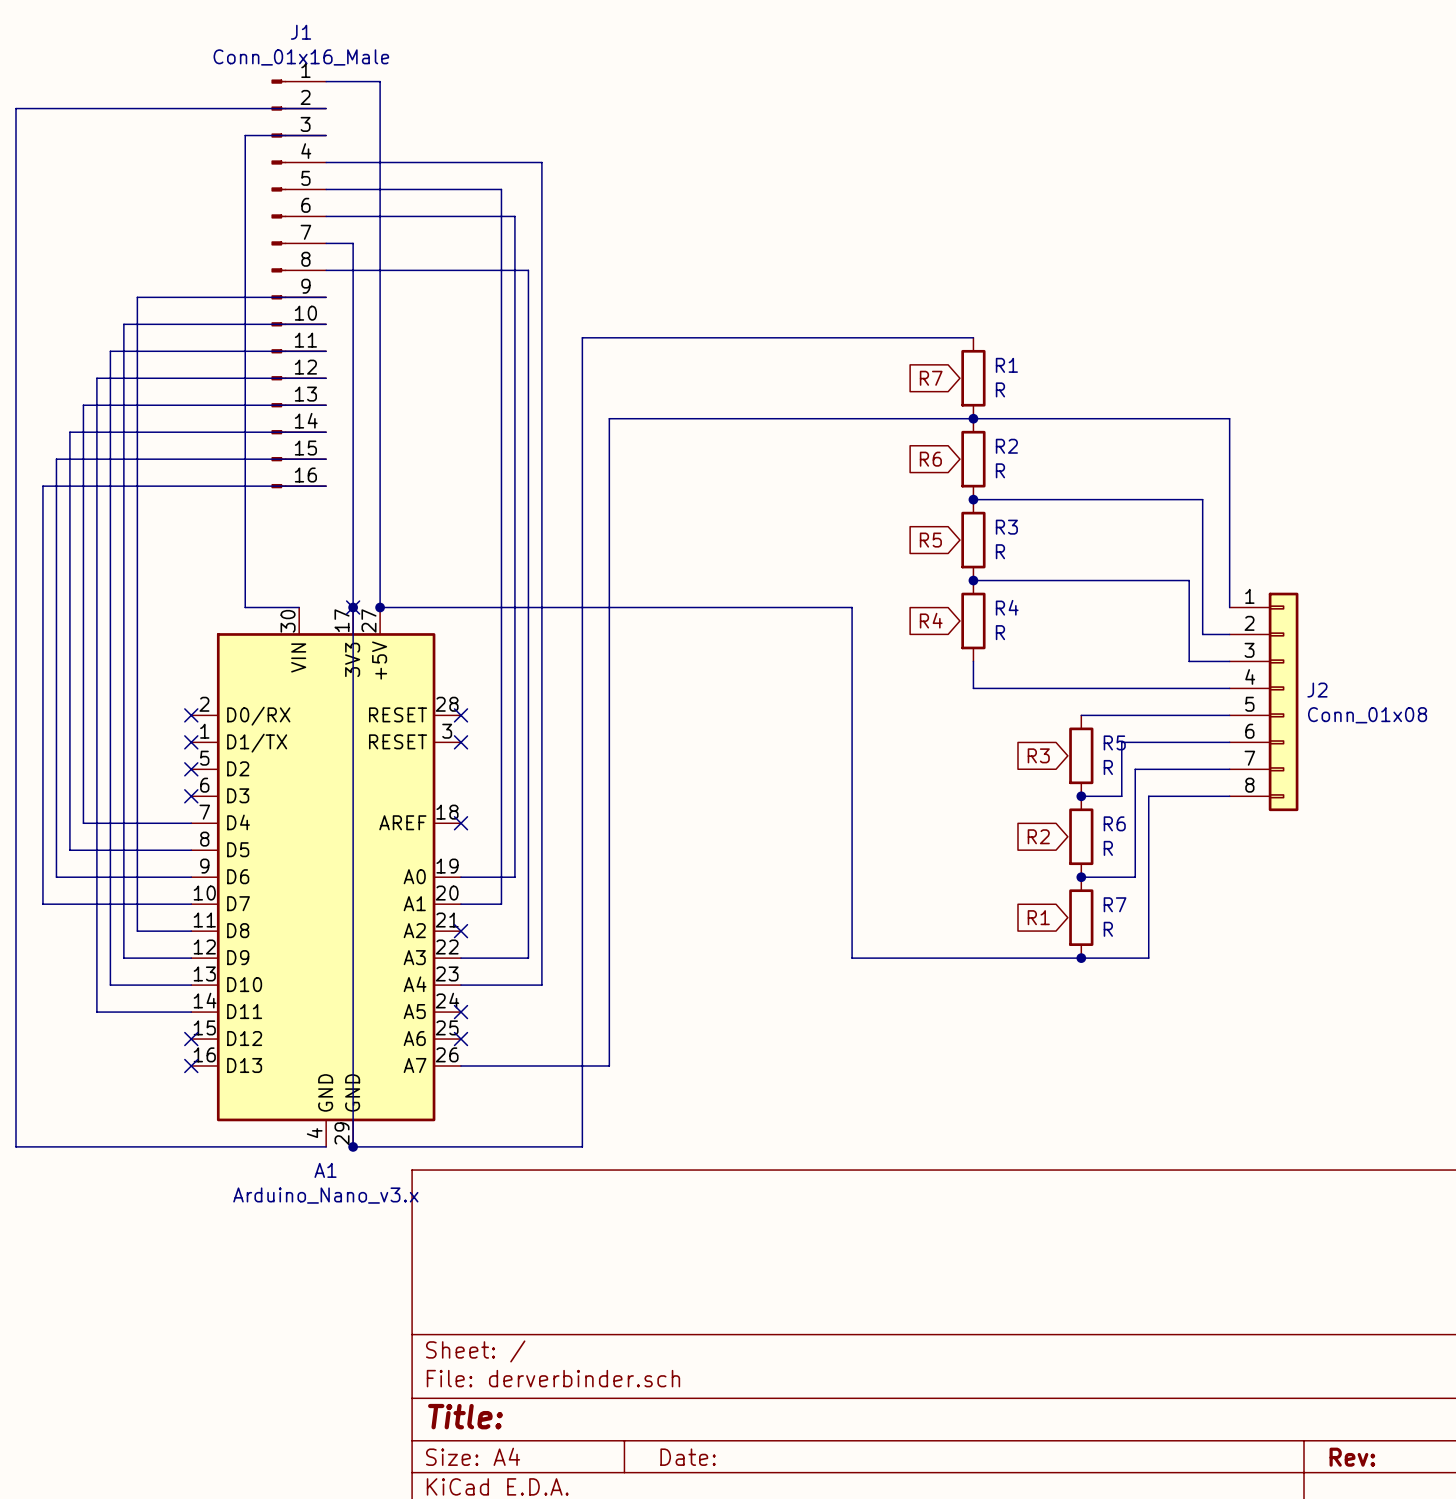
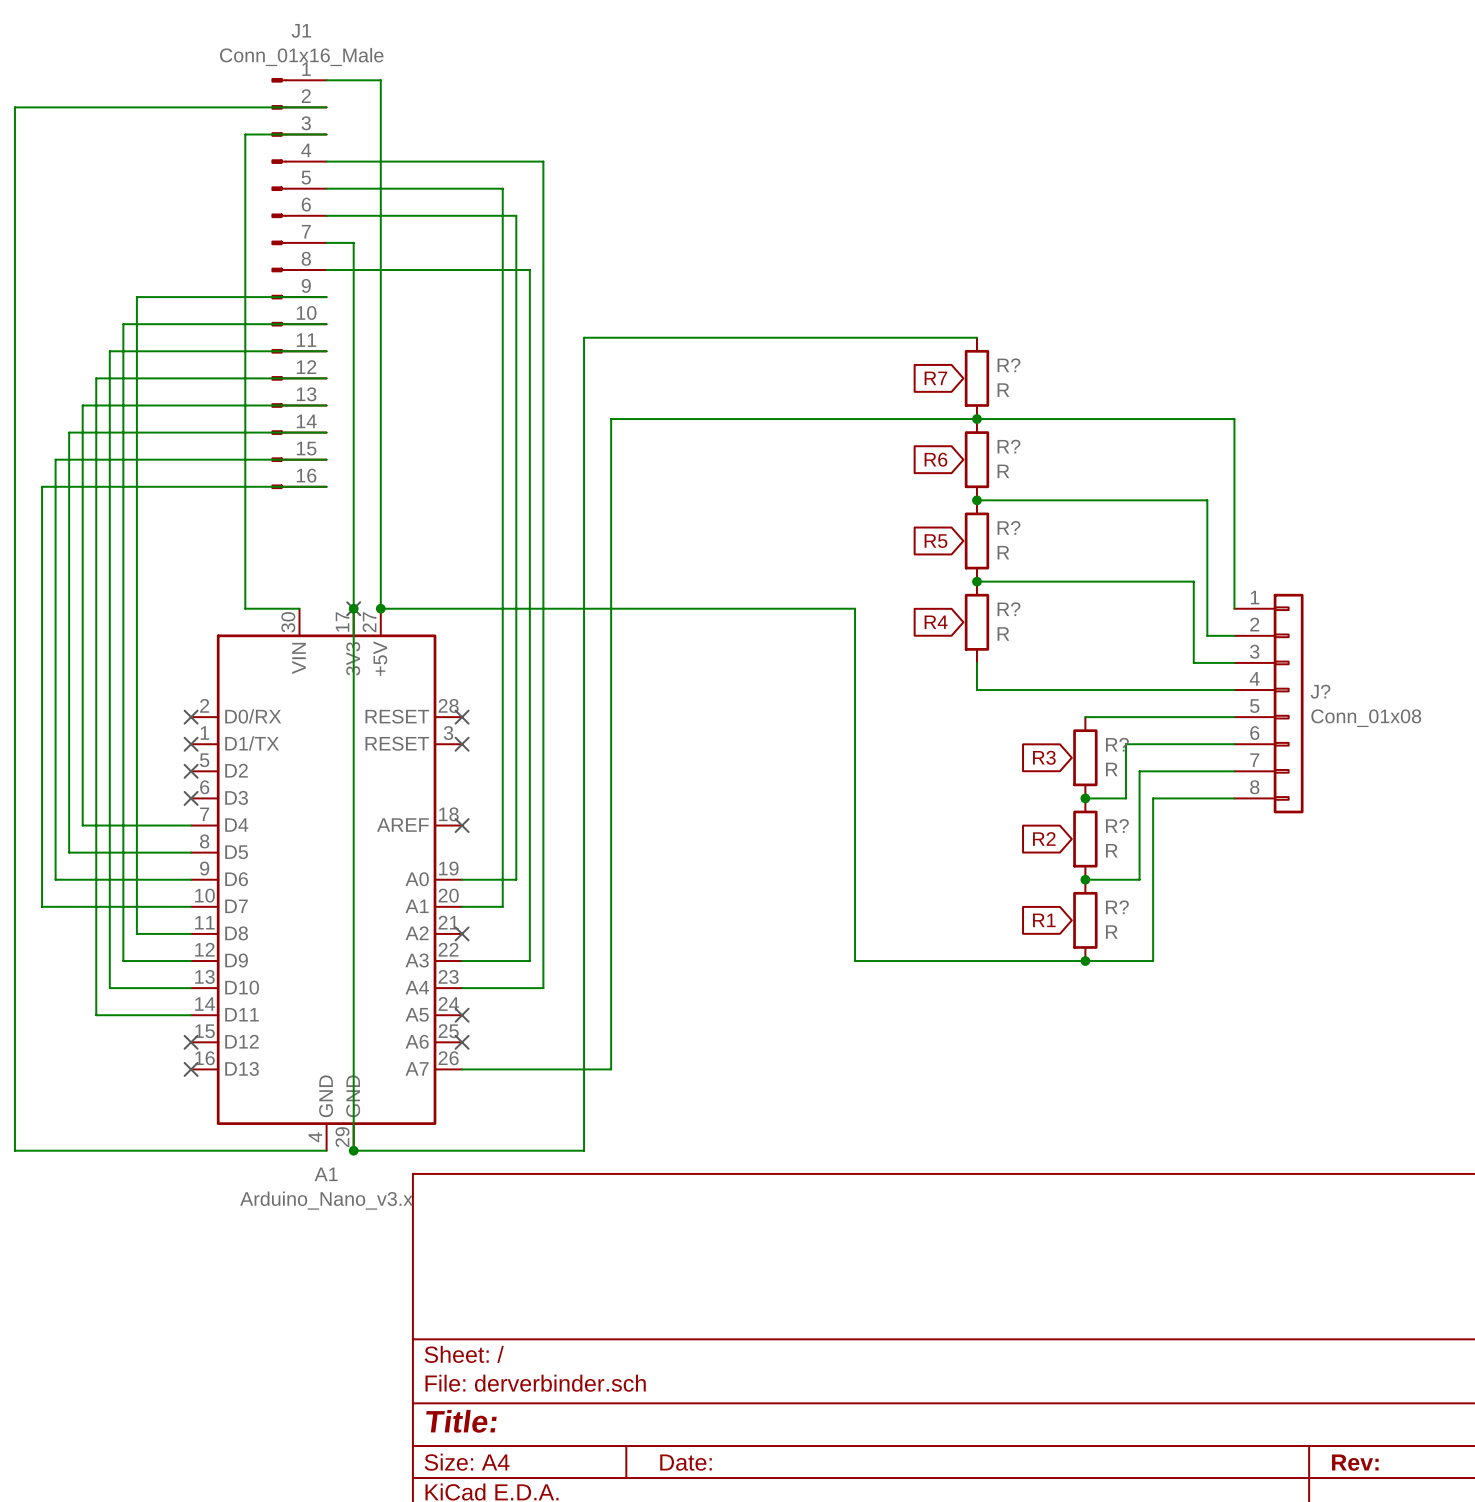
R1 name: R1 (1006, 365) -> R? (1008, 365)
R2 name: R2 (1006, 446) -> R? (1008, 446)
R3 name: R3 (1006, 527) -> R? (1008, 527)
R4 name: R4 (1007, 607) -> R? (1008, 609)
J2 name: J2 (1317, 690) -> J? (1320, 691)
R5 name: R5 (1114, 742) -> R? (1117, 744)
R6 name: R6 (1114, 823) -> R? (1117, 826)
R7 name: R7 (1115, 904) -> R? (1117, 907)

